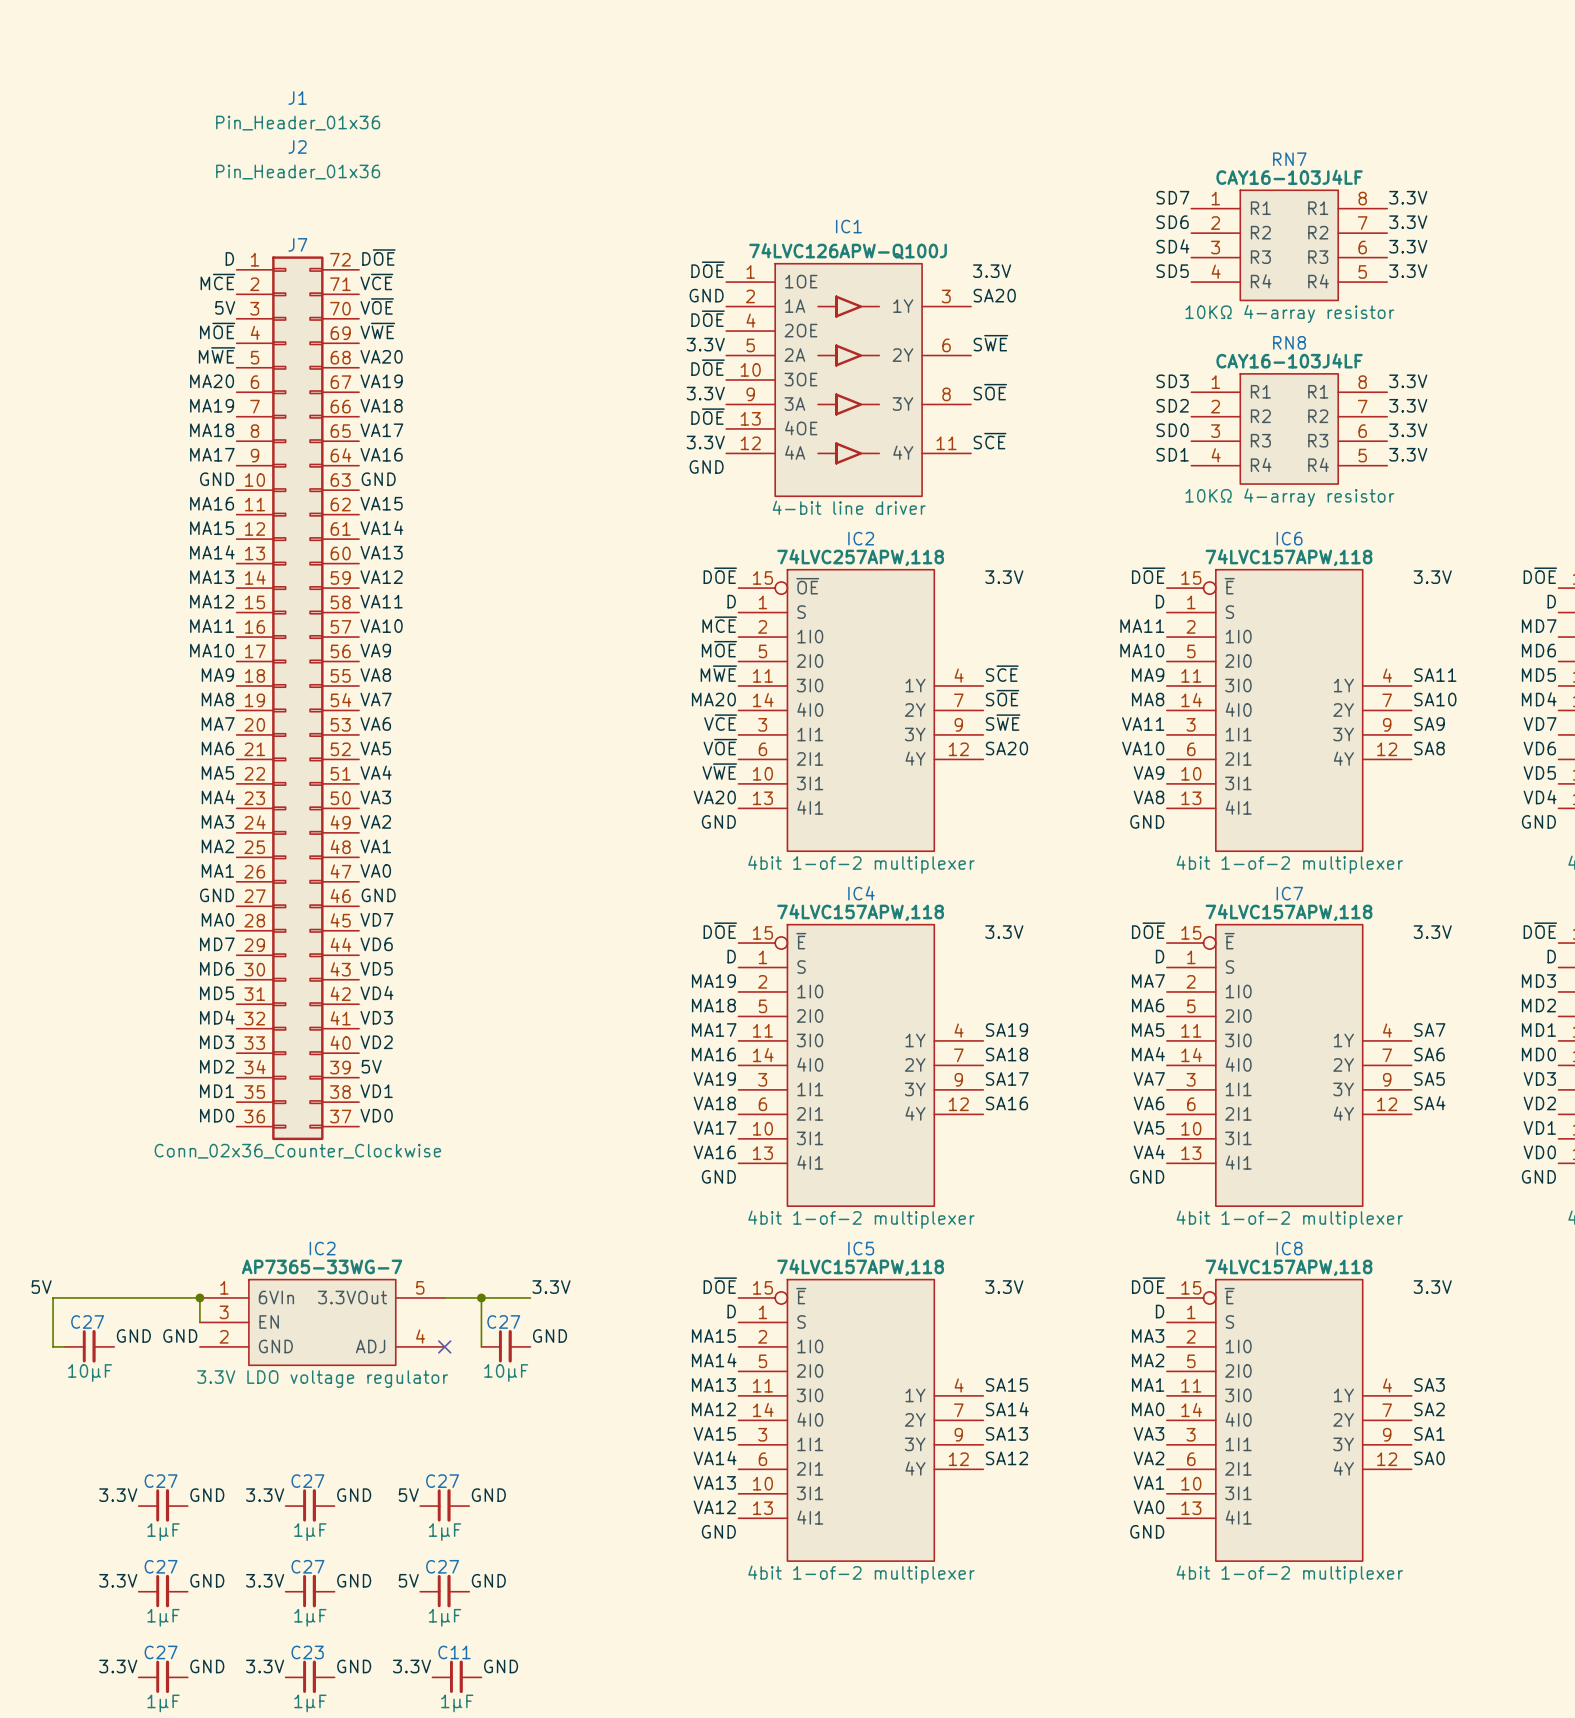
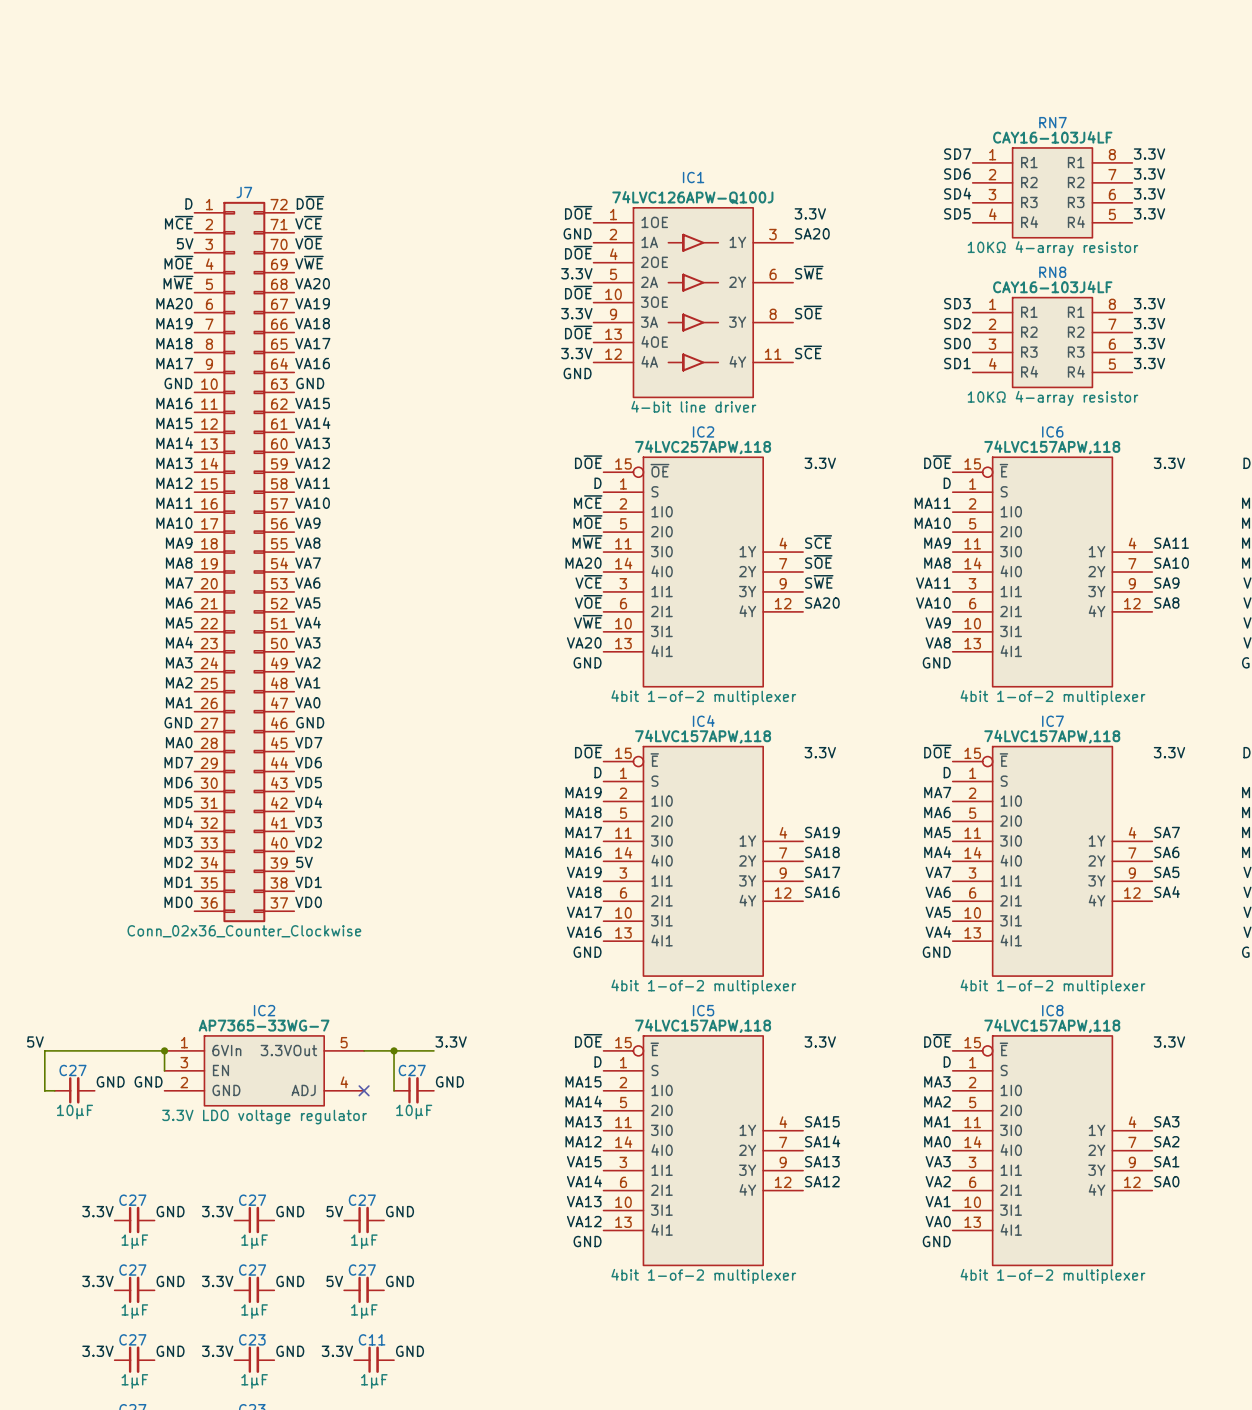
J1: Pin_Header_01x36 (298, 110) -> none
J2: Pin_Header_01x36 (298, 159) -> none

